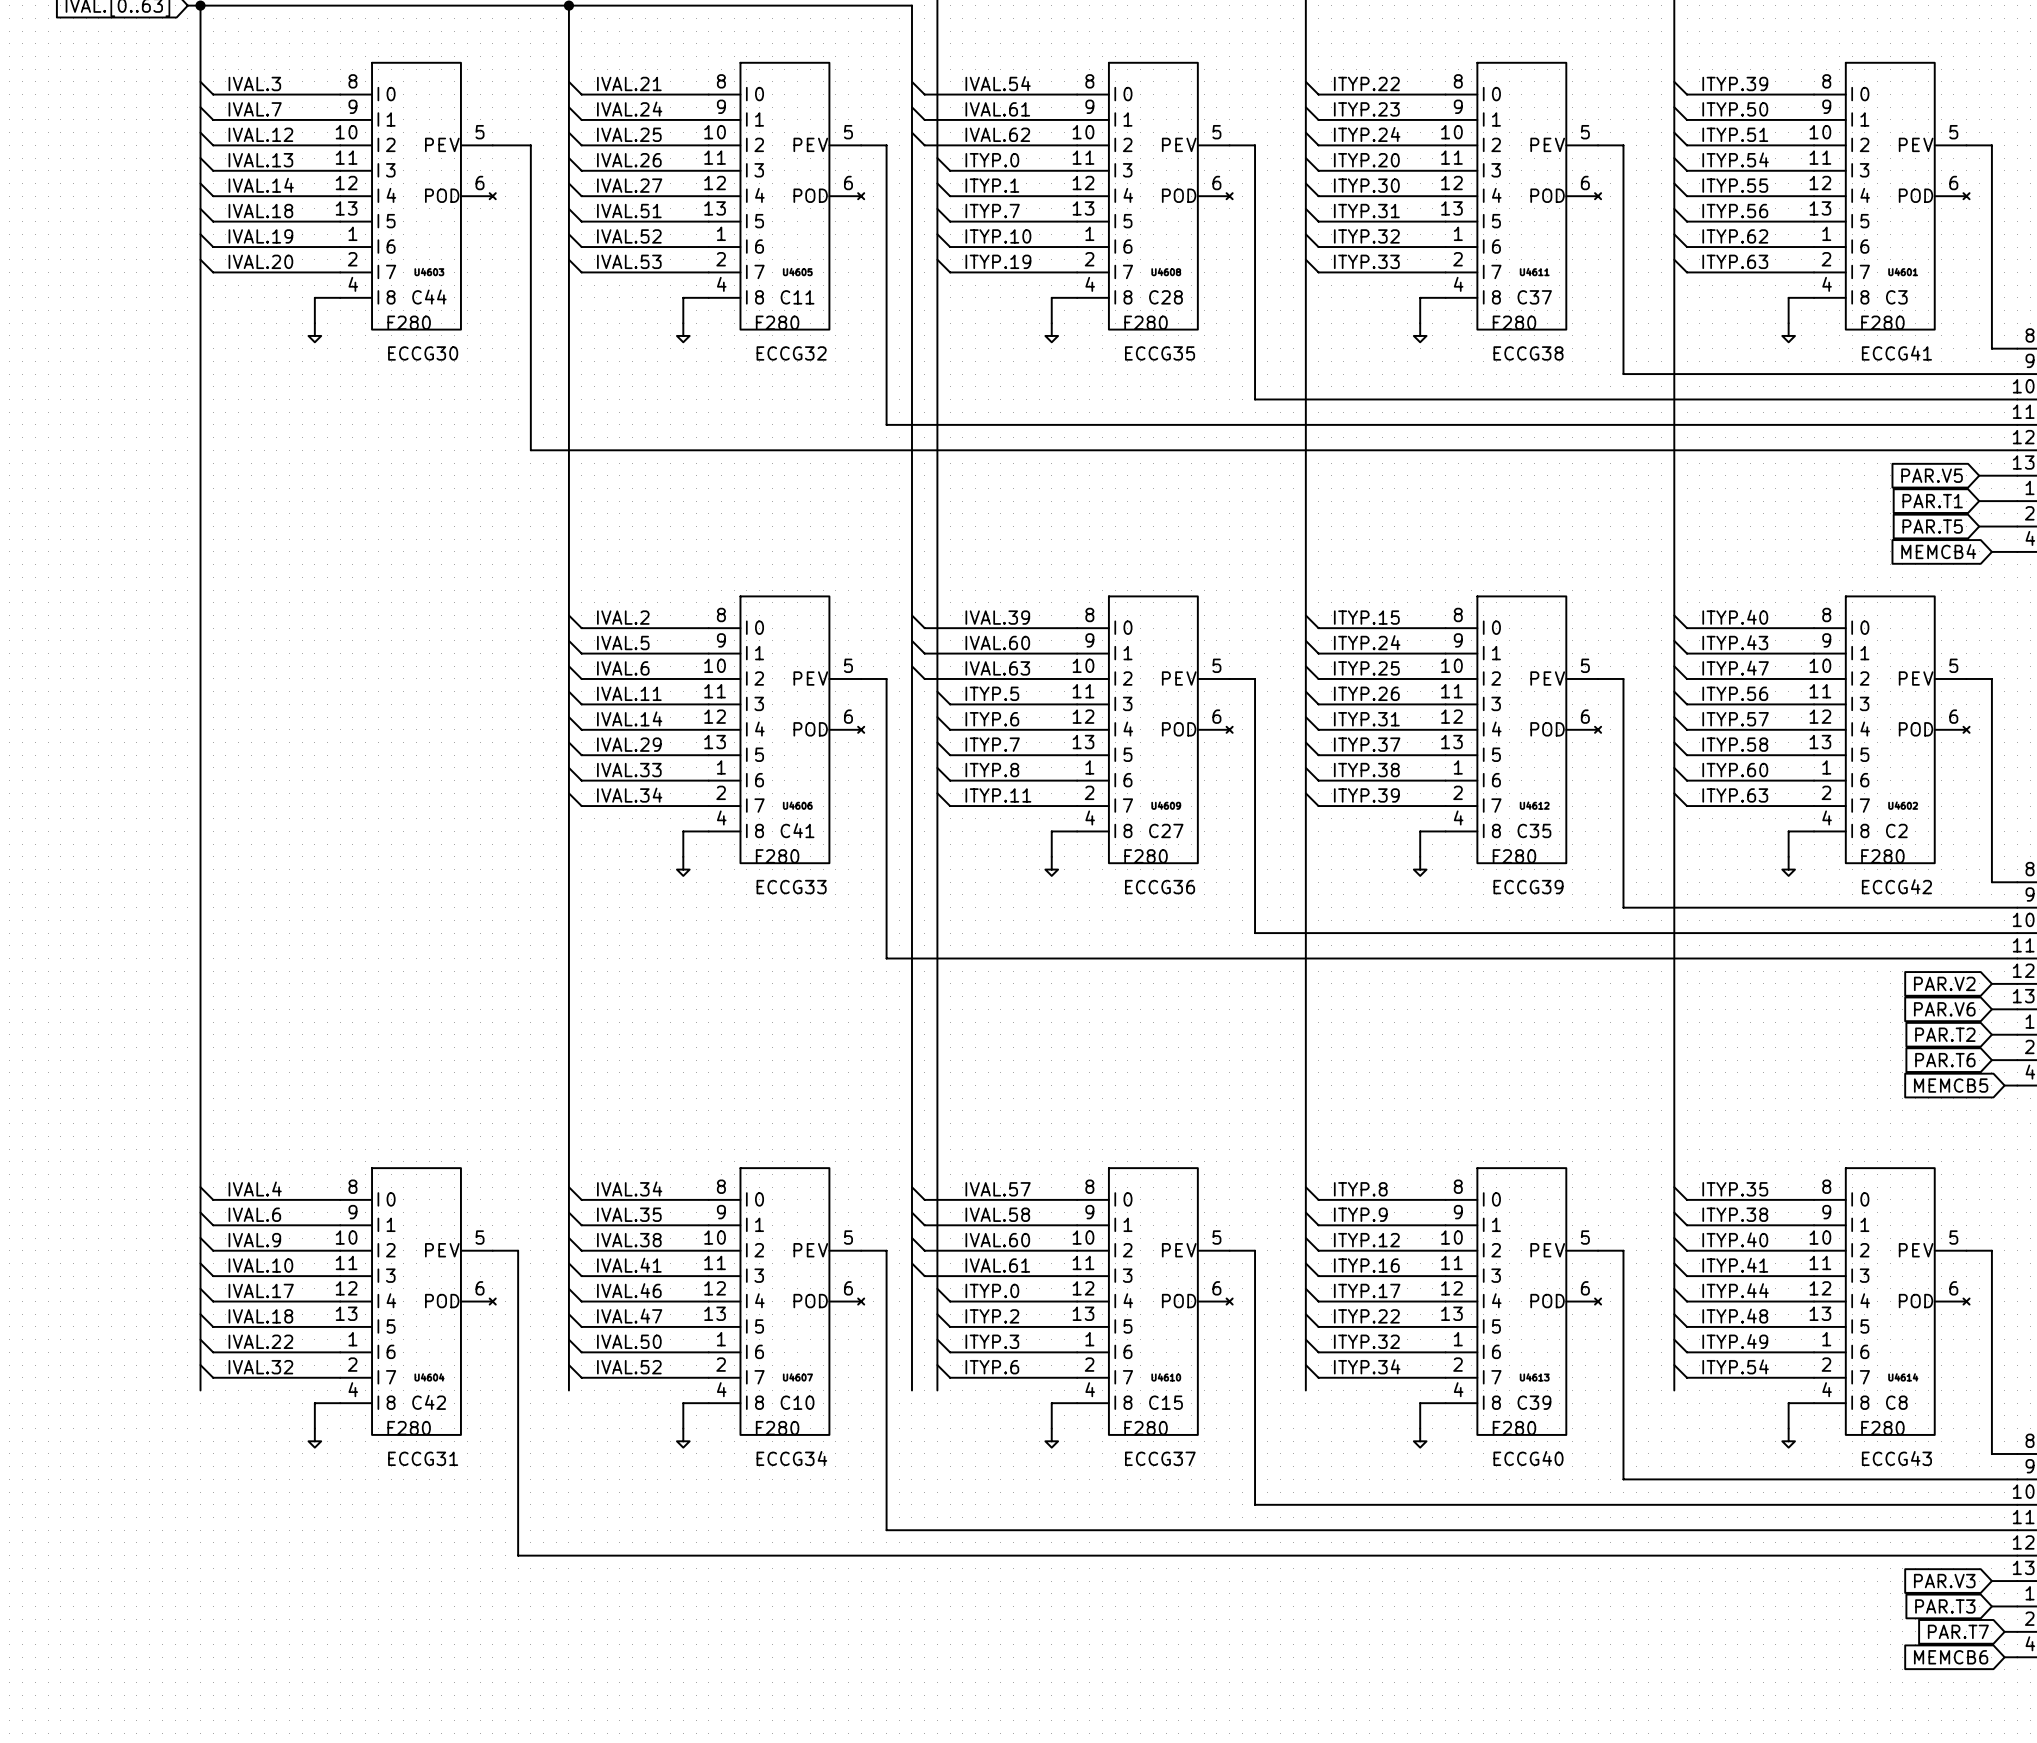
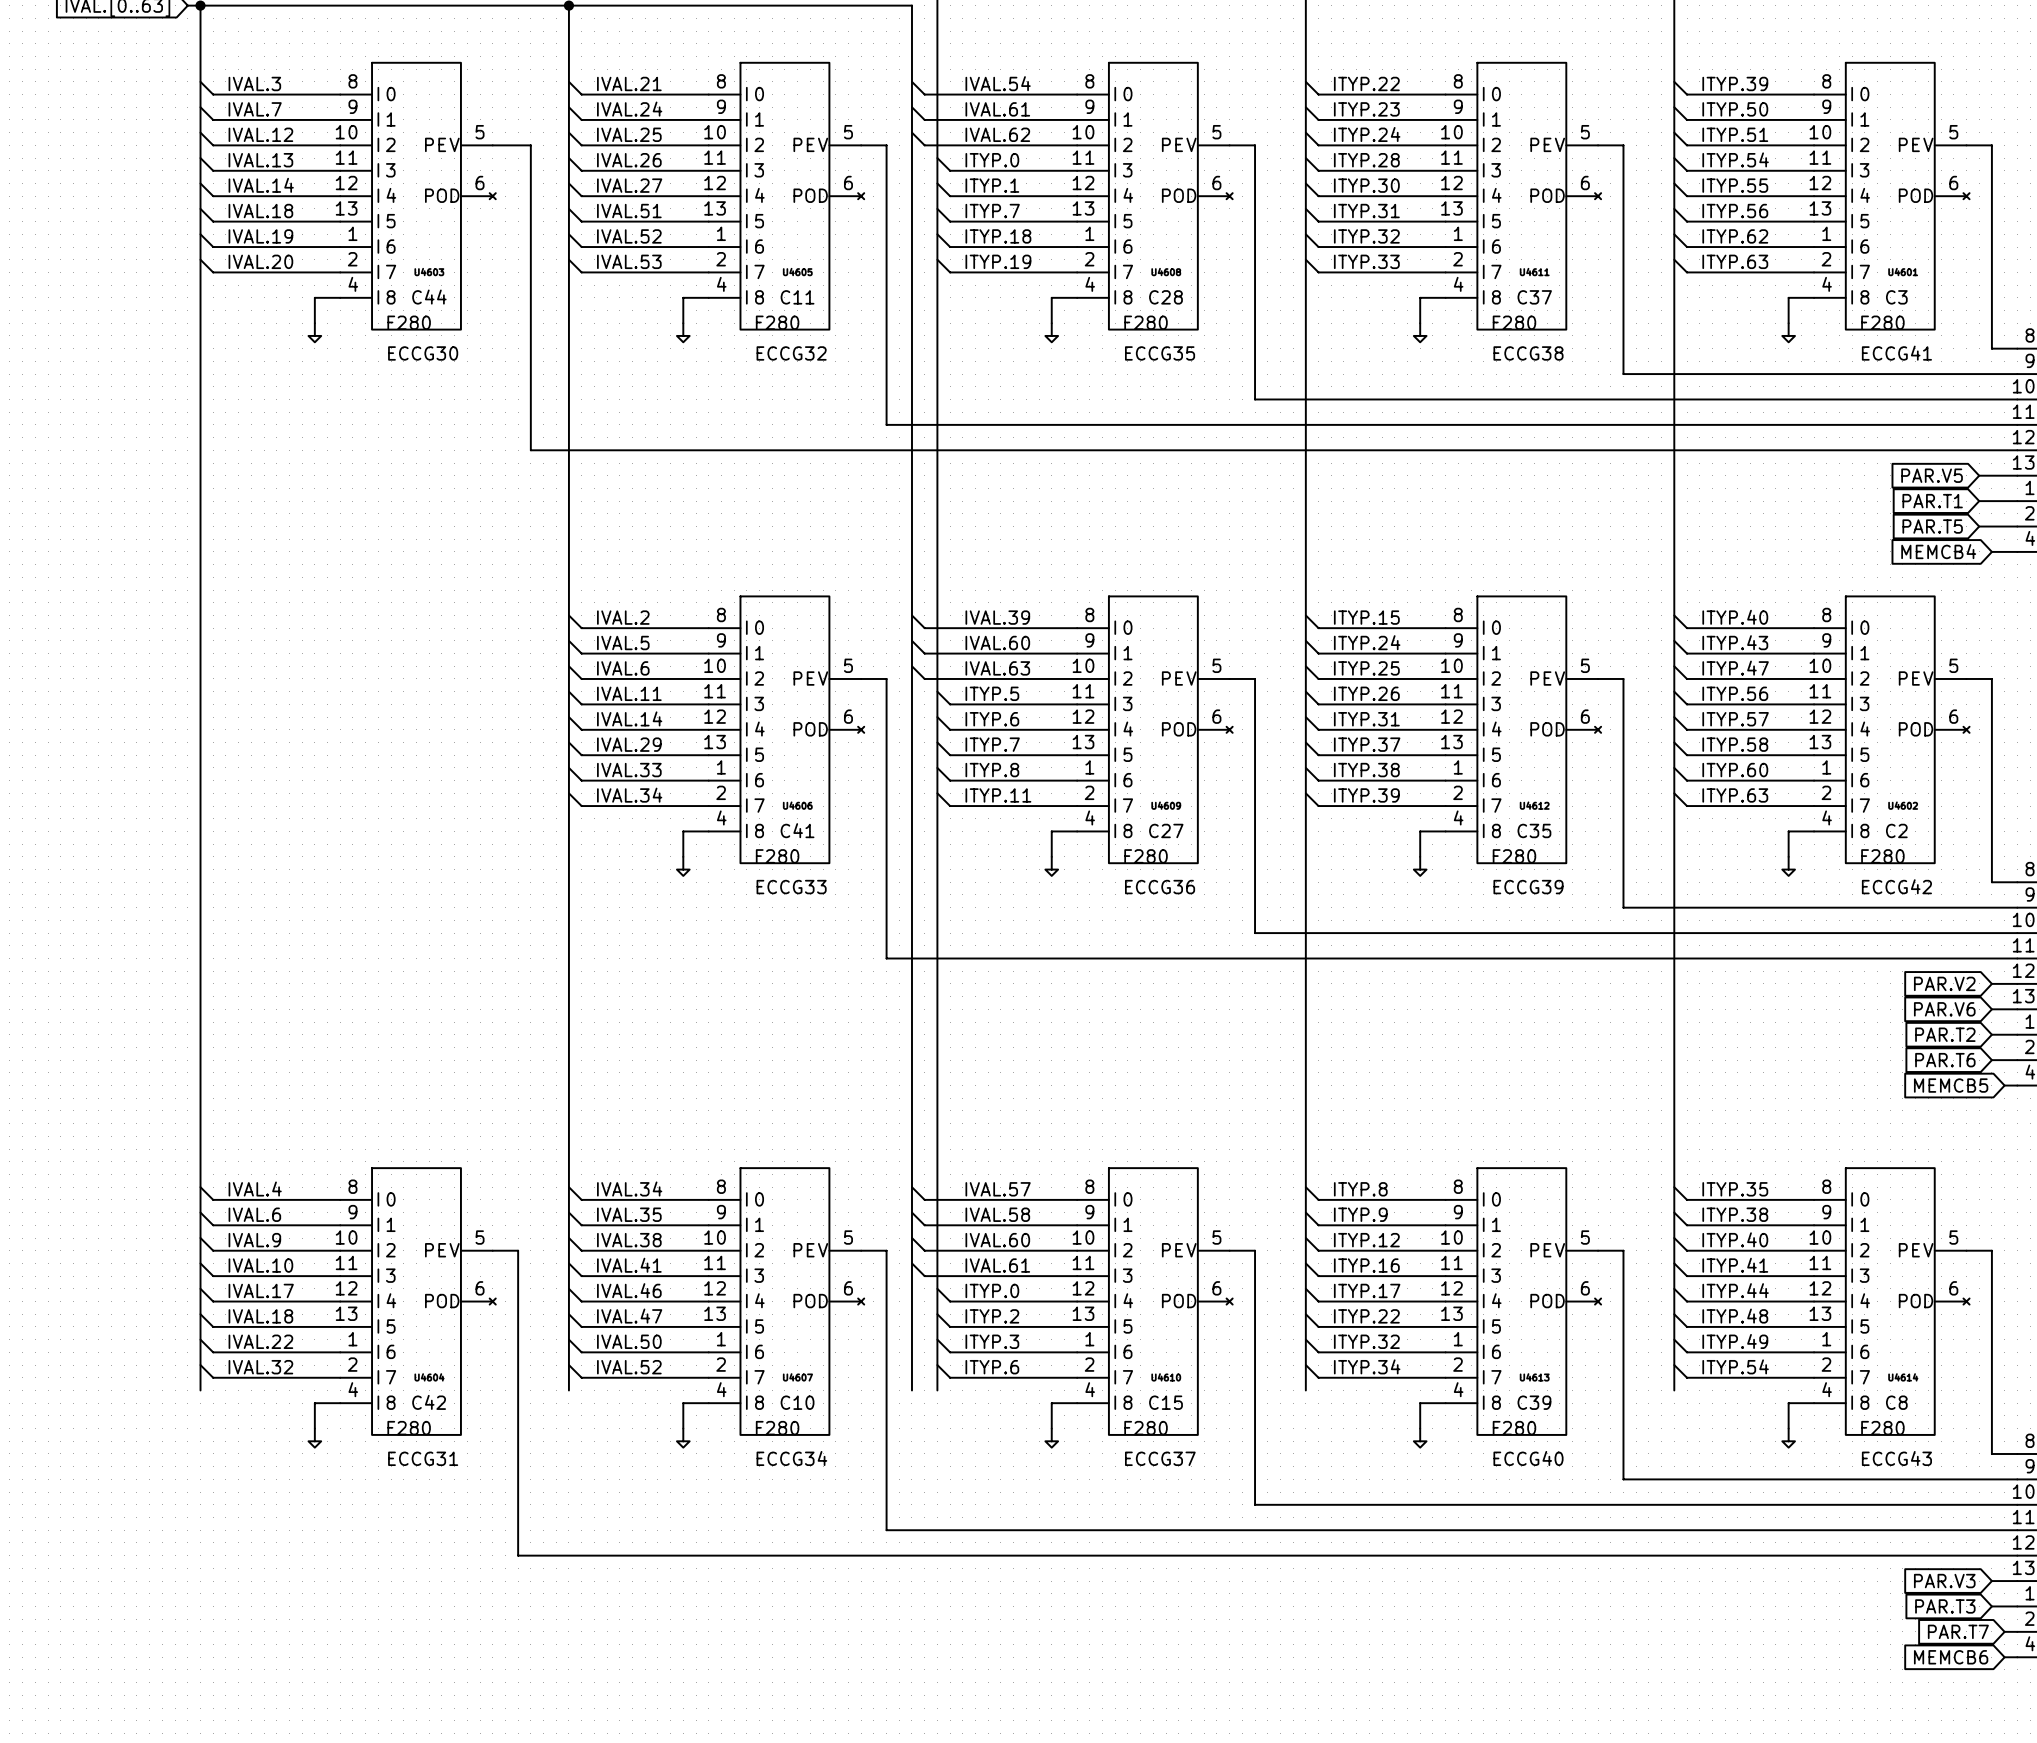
label: ITYP.20 (1366, 160) -> ITYP.28 (1366, 160)
label: ITYP.10 (998, 236) -> ITYP.18 (998, 236)

